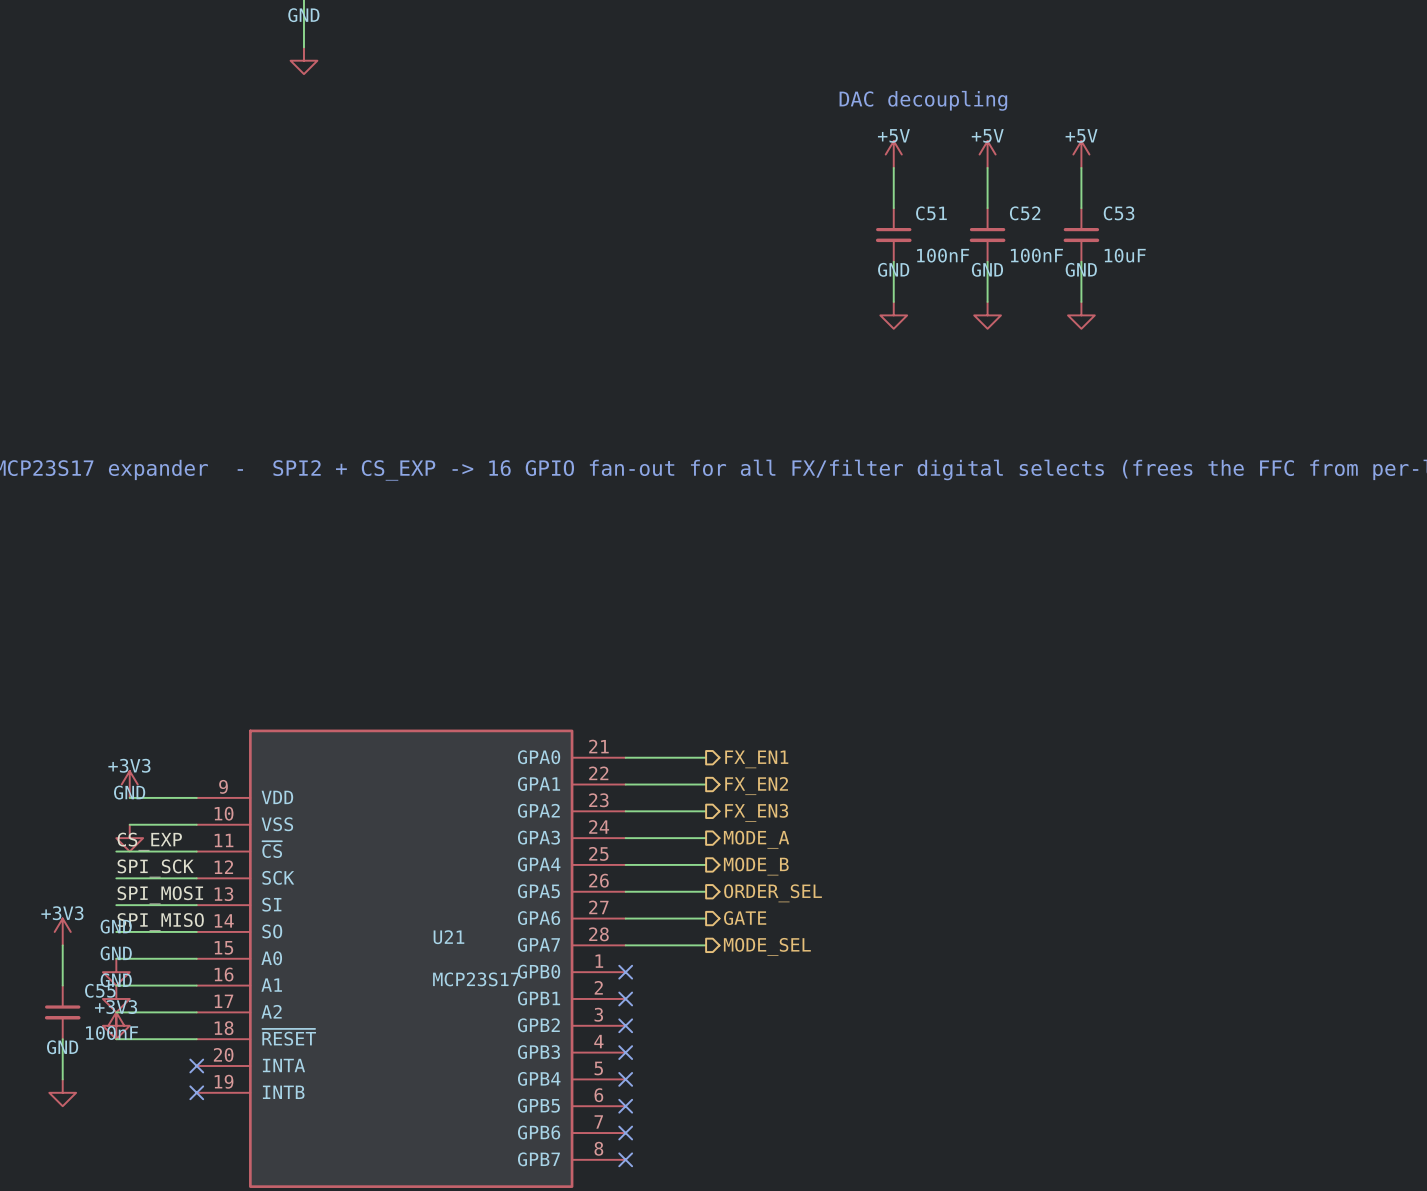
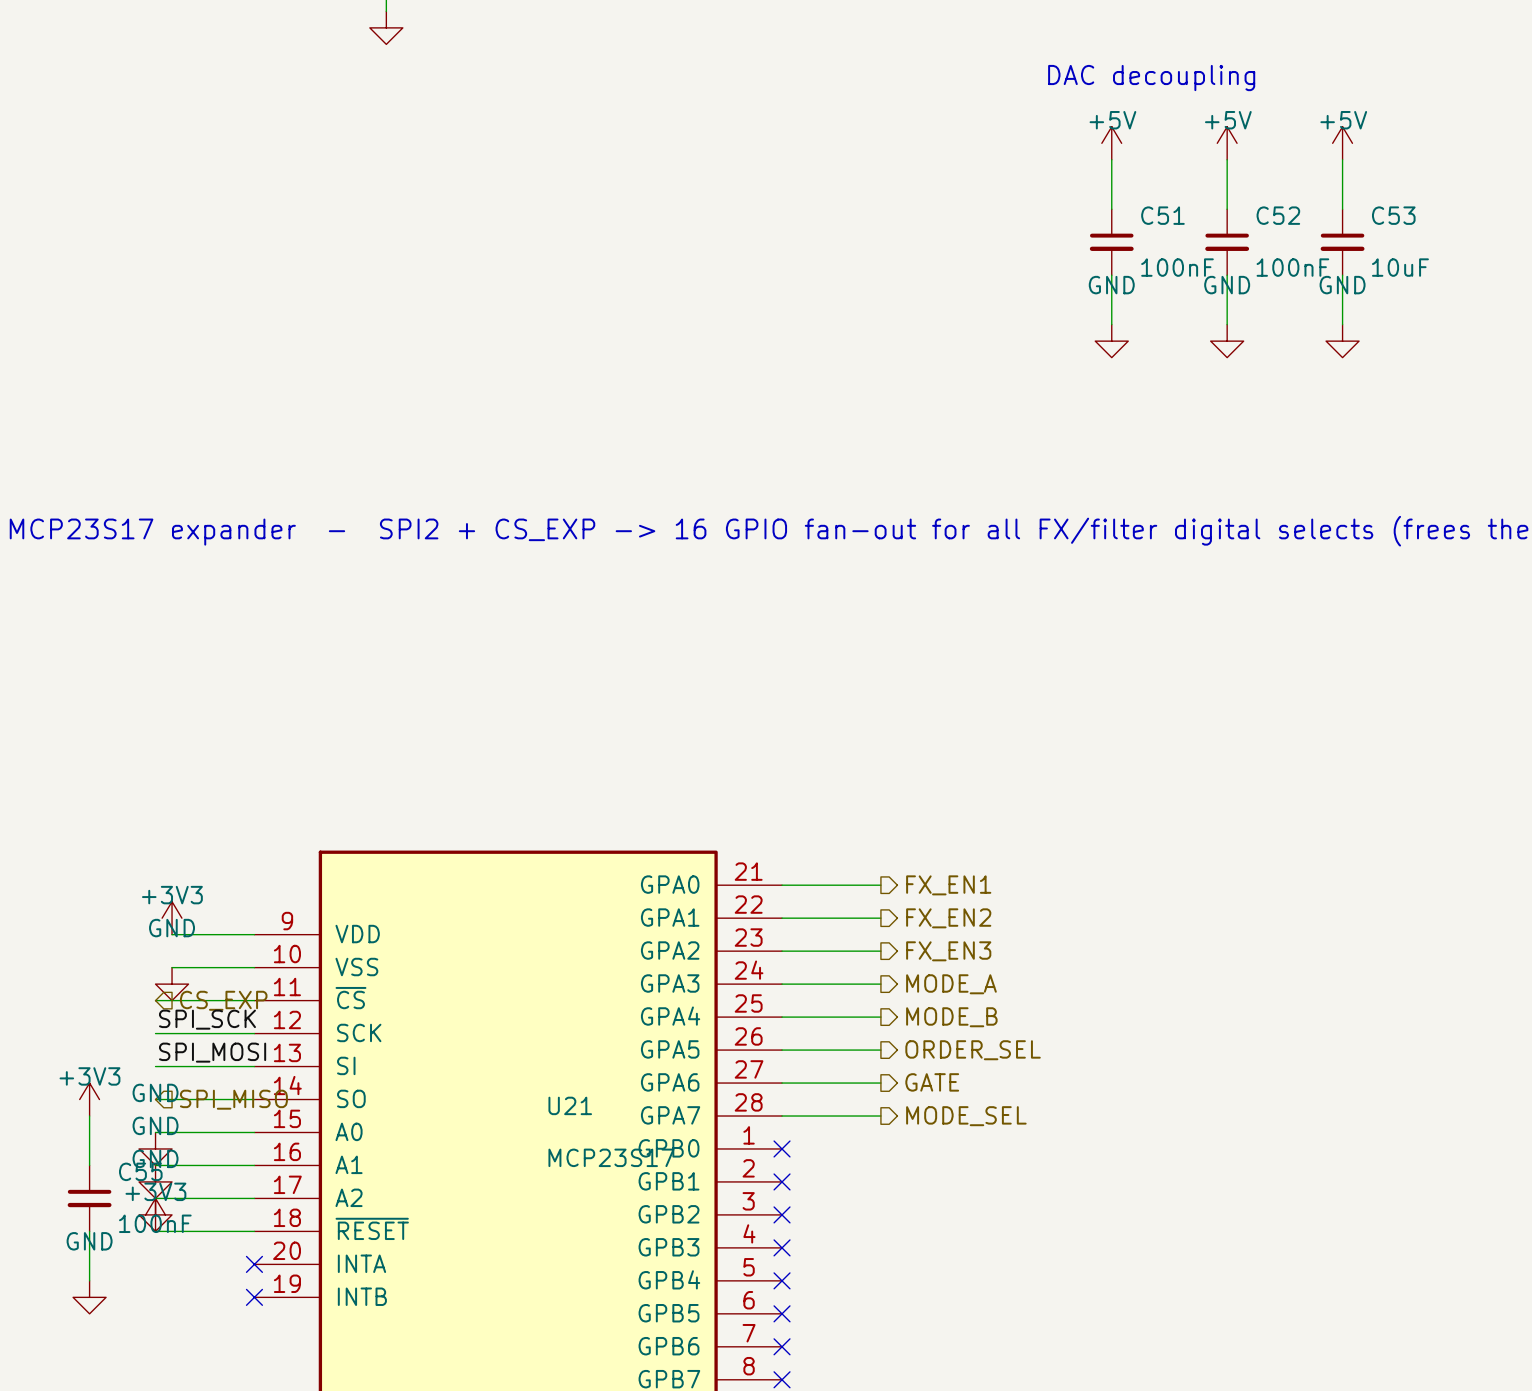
label: CS_EXP (149, 841) -> none
hierarchical label: none -> CS_EXP (223, 1000)
label: SPI_MISO (160, 922) -> none
hierarchical label: none -> SPI_MISO (233, 1099)

